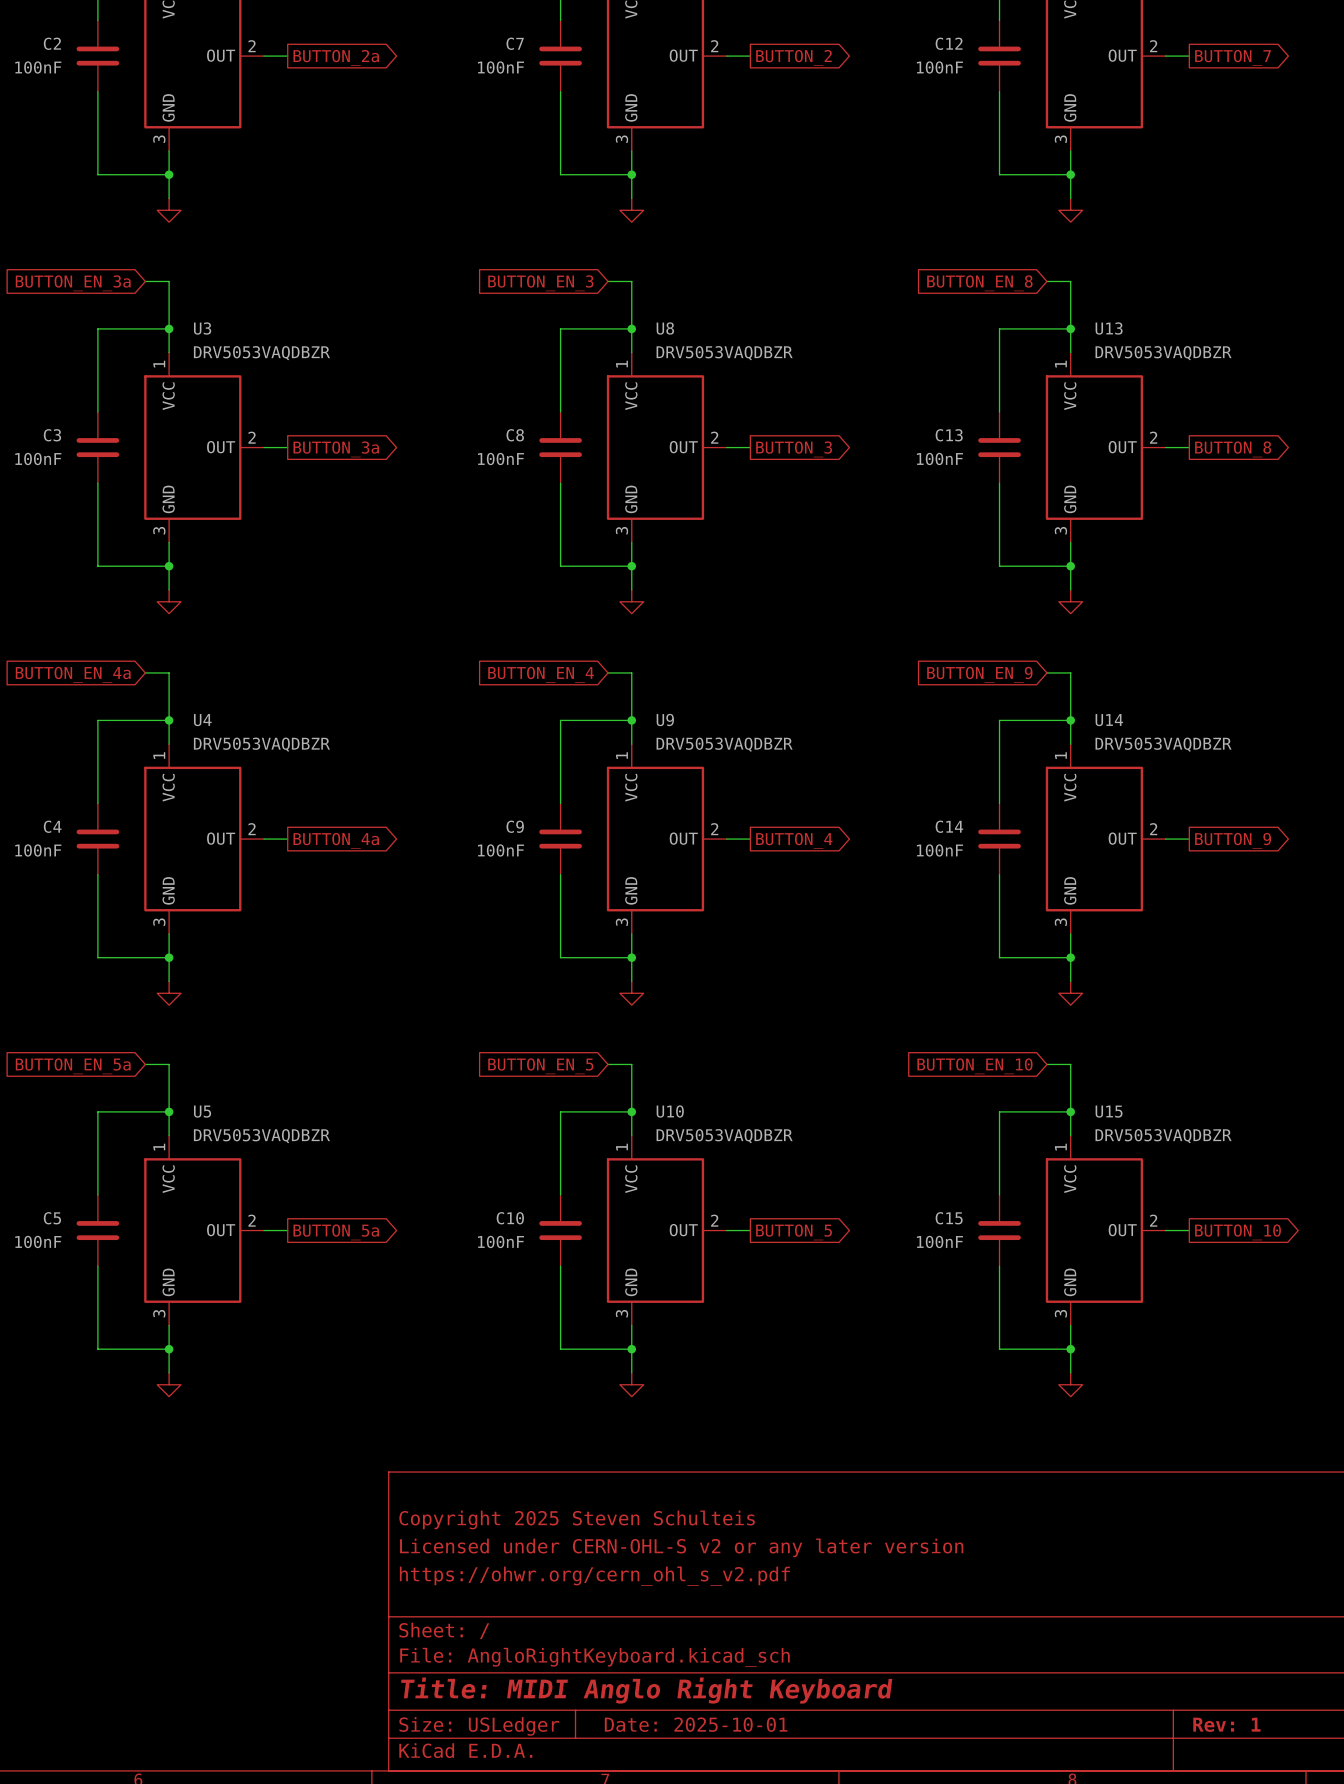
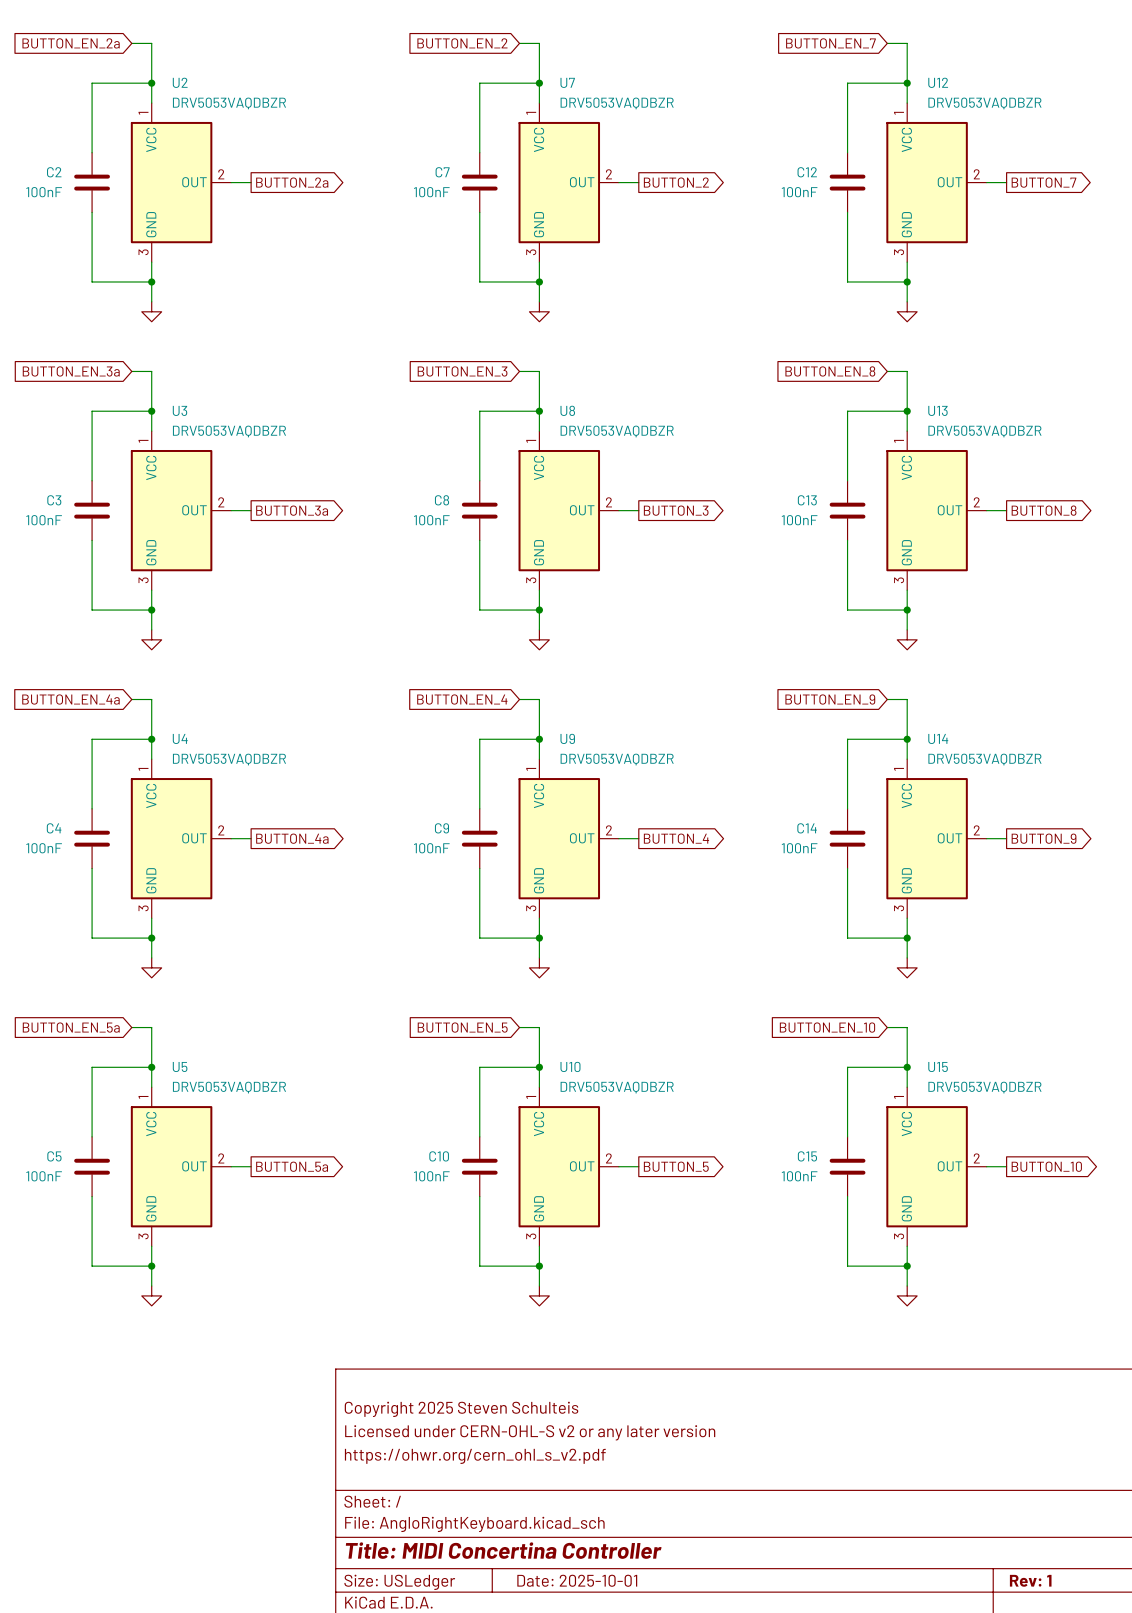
title block: Title: MIDI Anglo Right Keyboard (646, 1690) -> Title: MIDI Concertina Controller (503, 1550)

